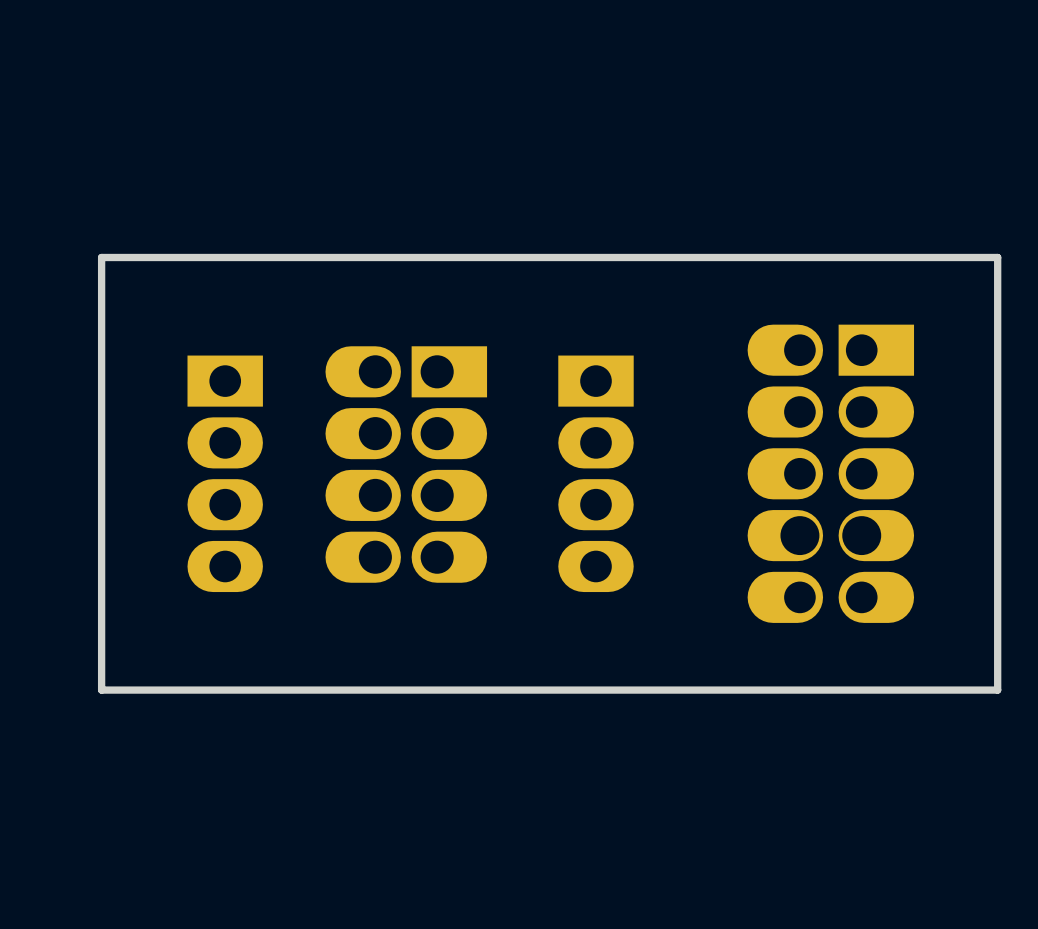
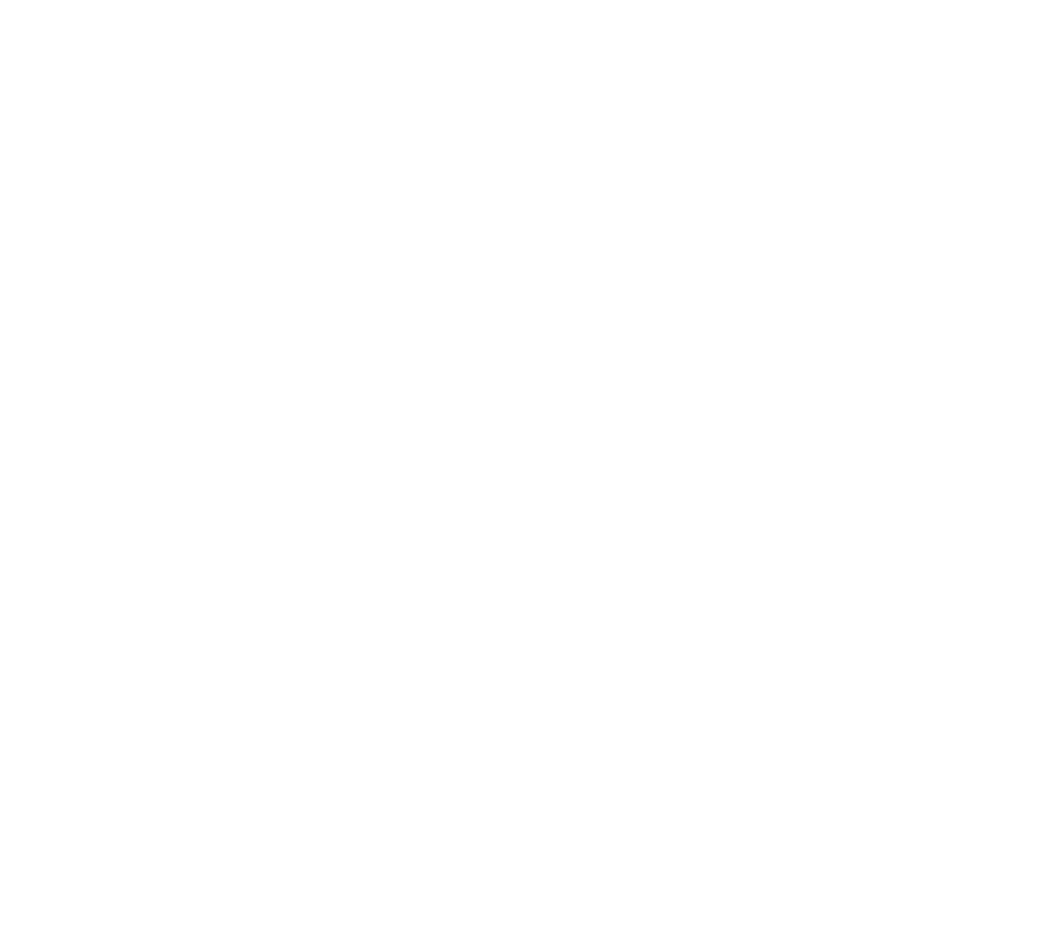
board edge: (997, 257) (997, 690) (101, 690) (101, 257) (997, 257) -> none
part: (406, 464) -> none
part: (225, 473) -> none
part: (595, 473) -> none
part: (830, 473) -> none

